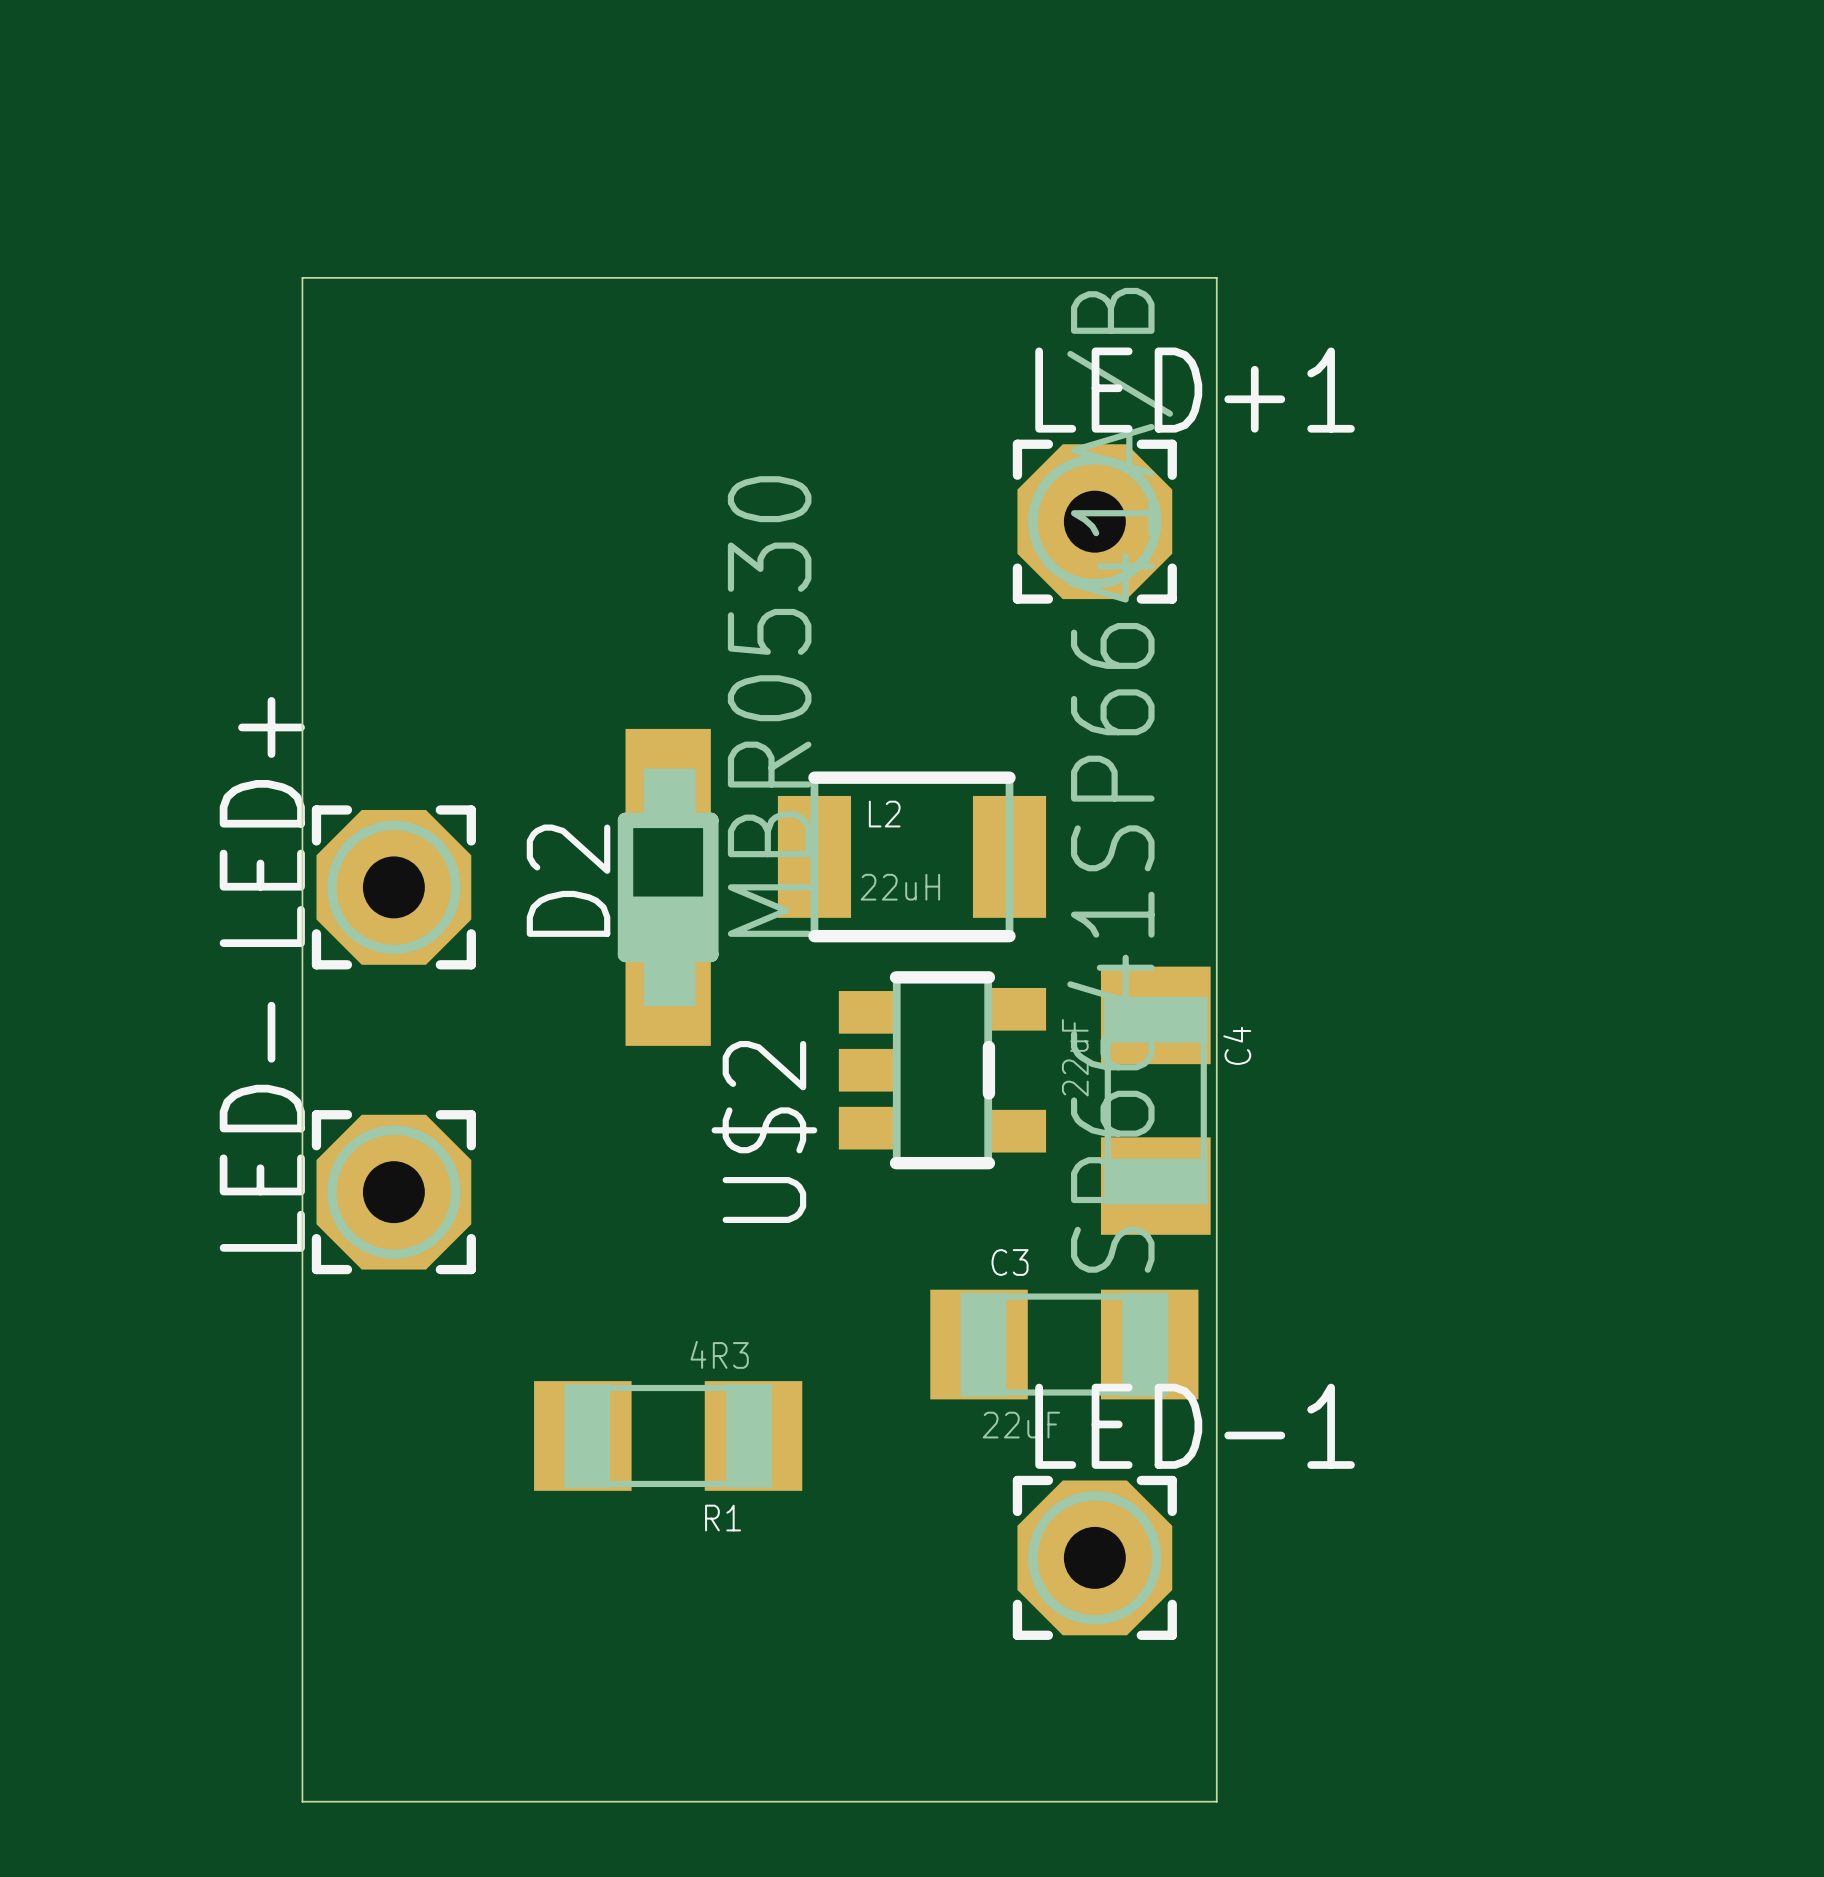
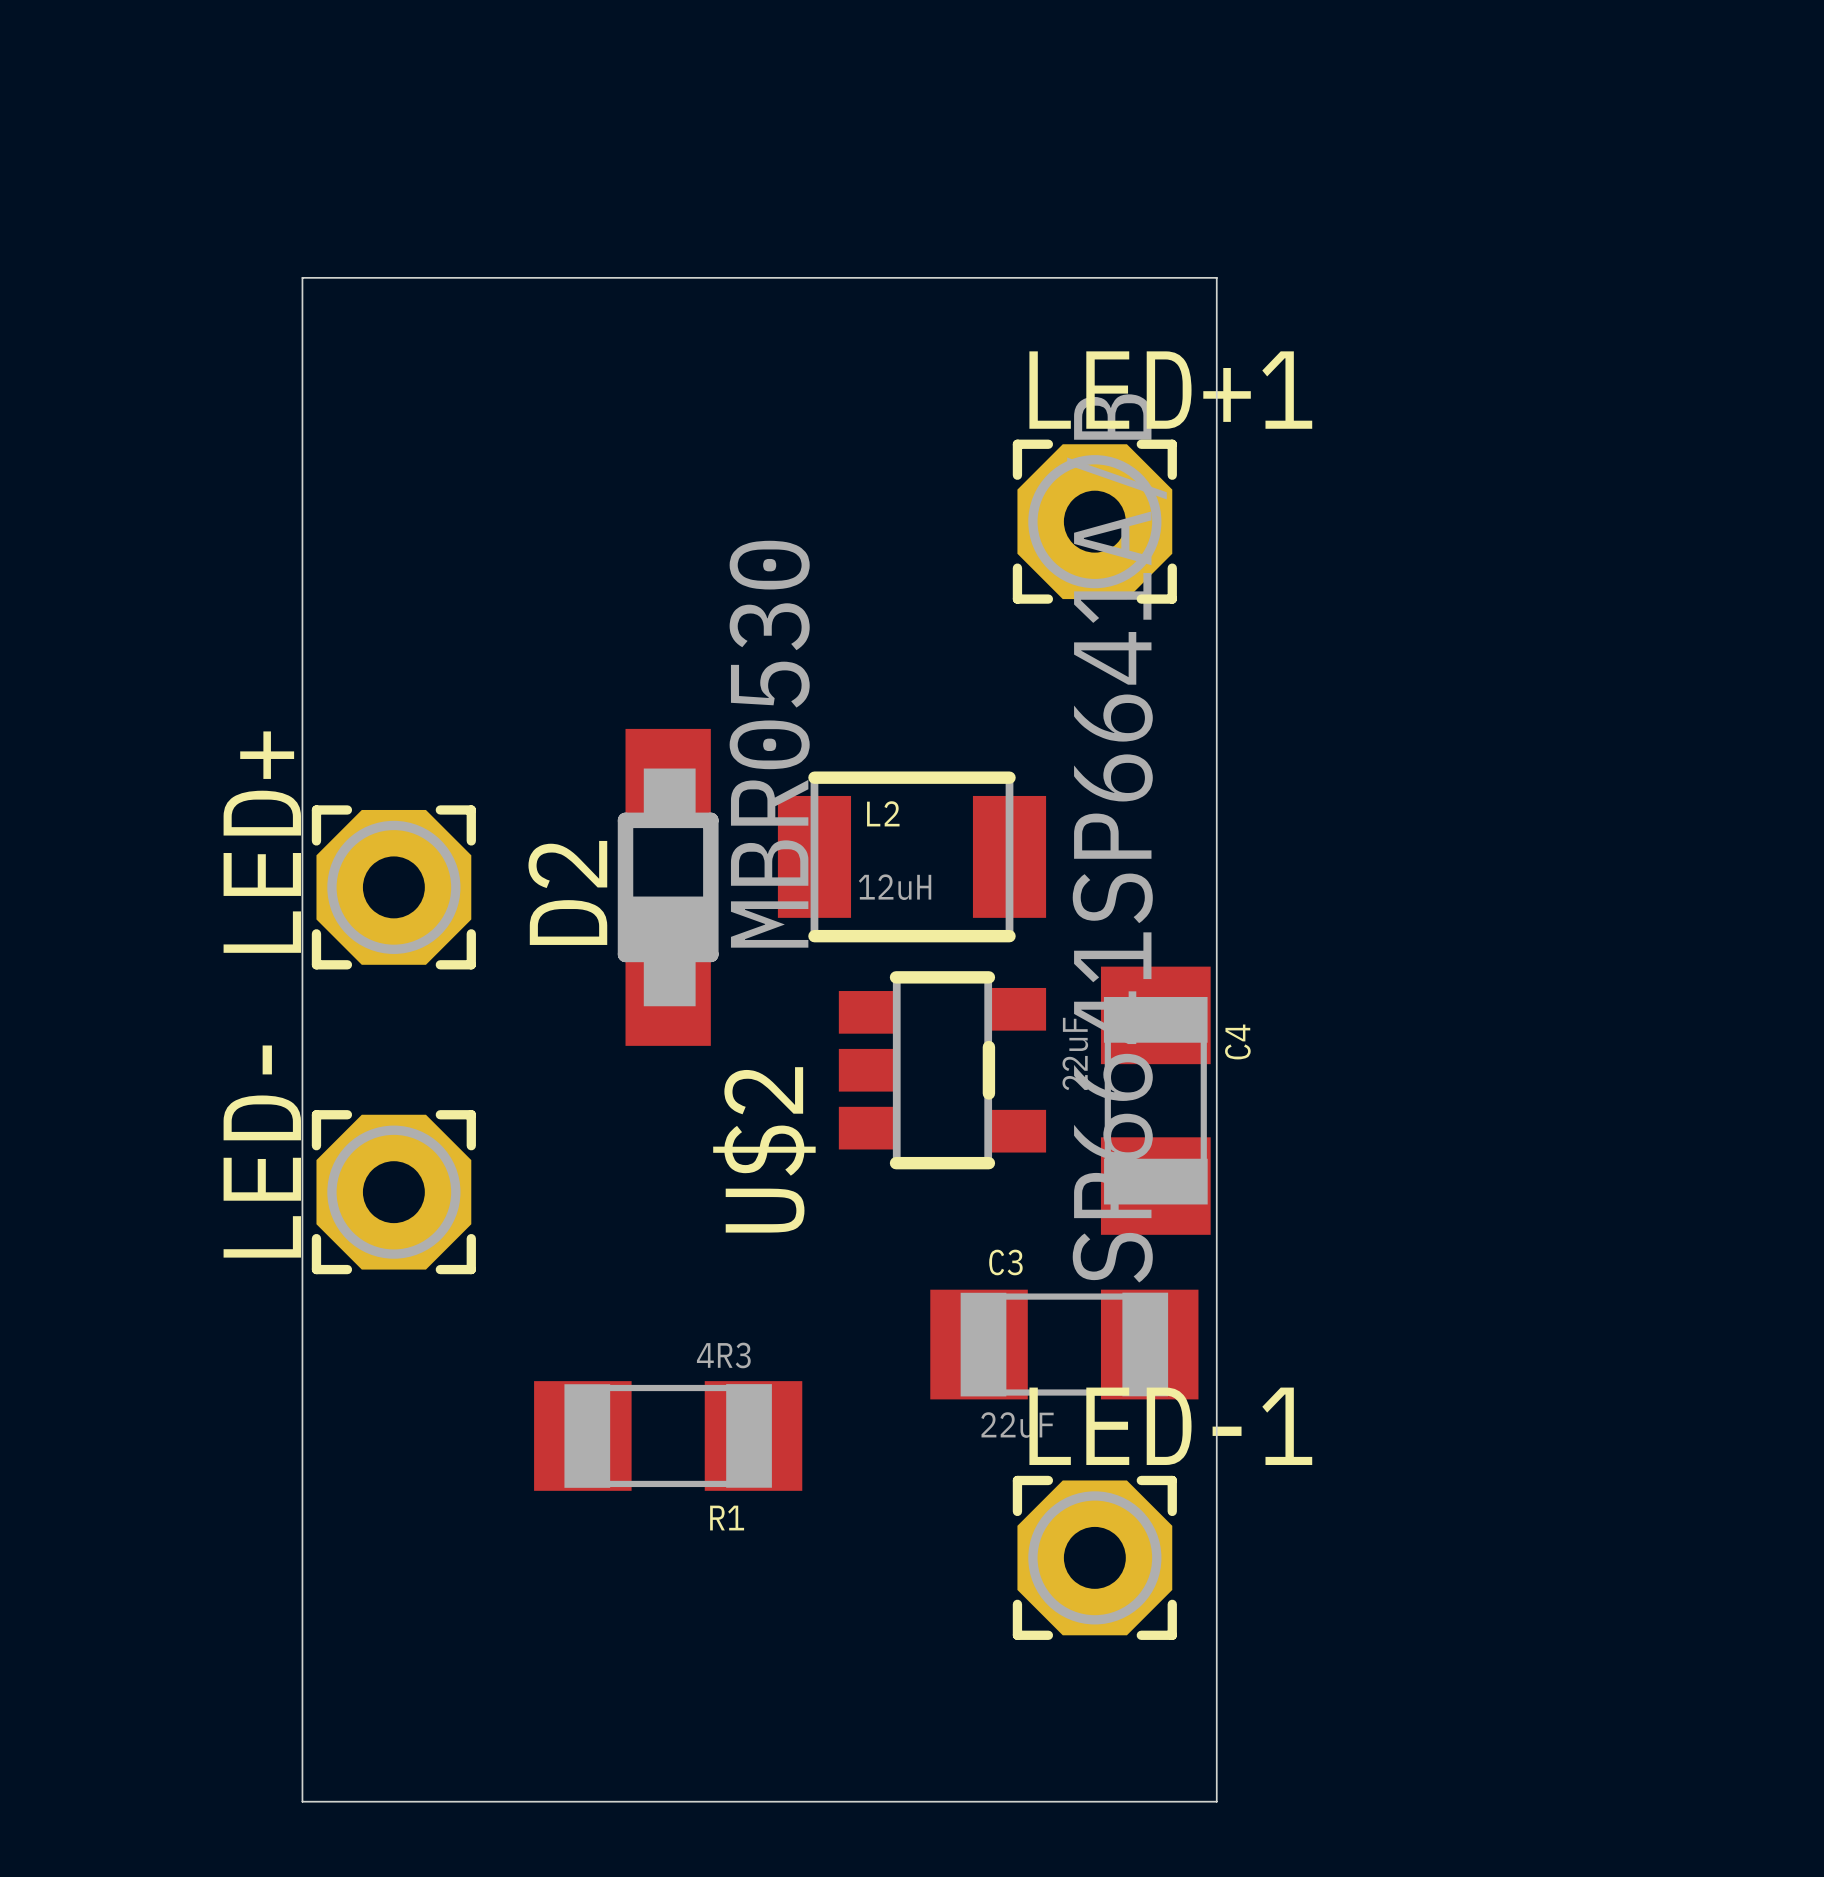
L2 value: 22uH (900, 887) -> 12uH (895, 887)

